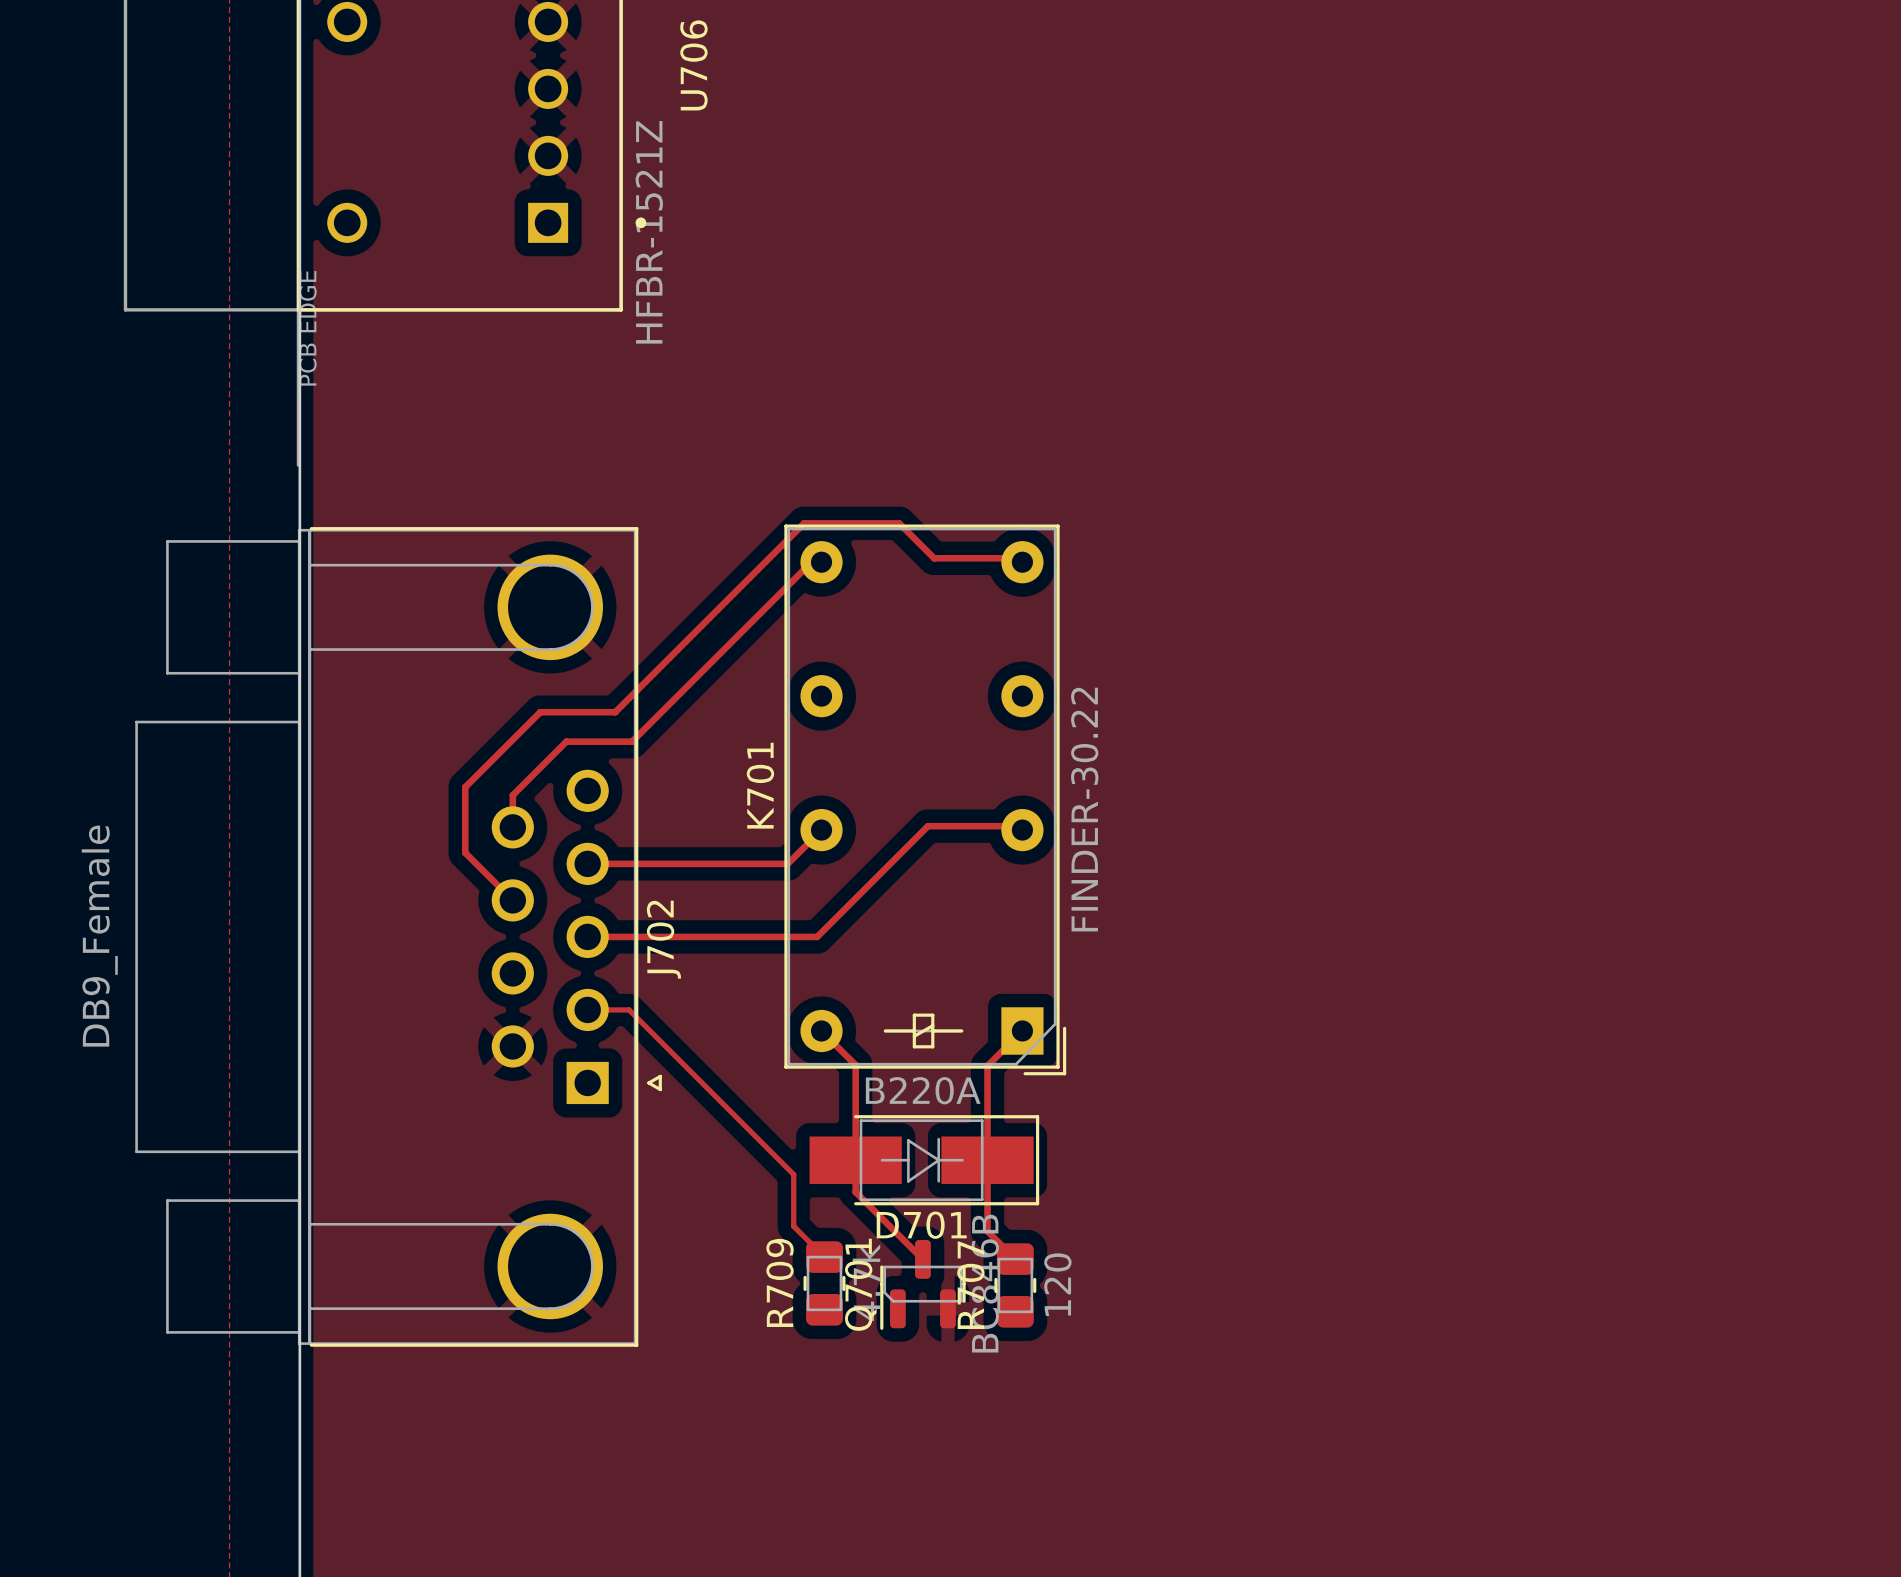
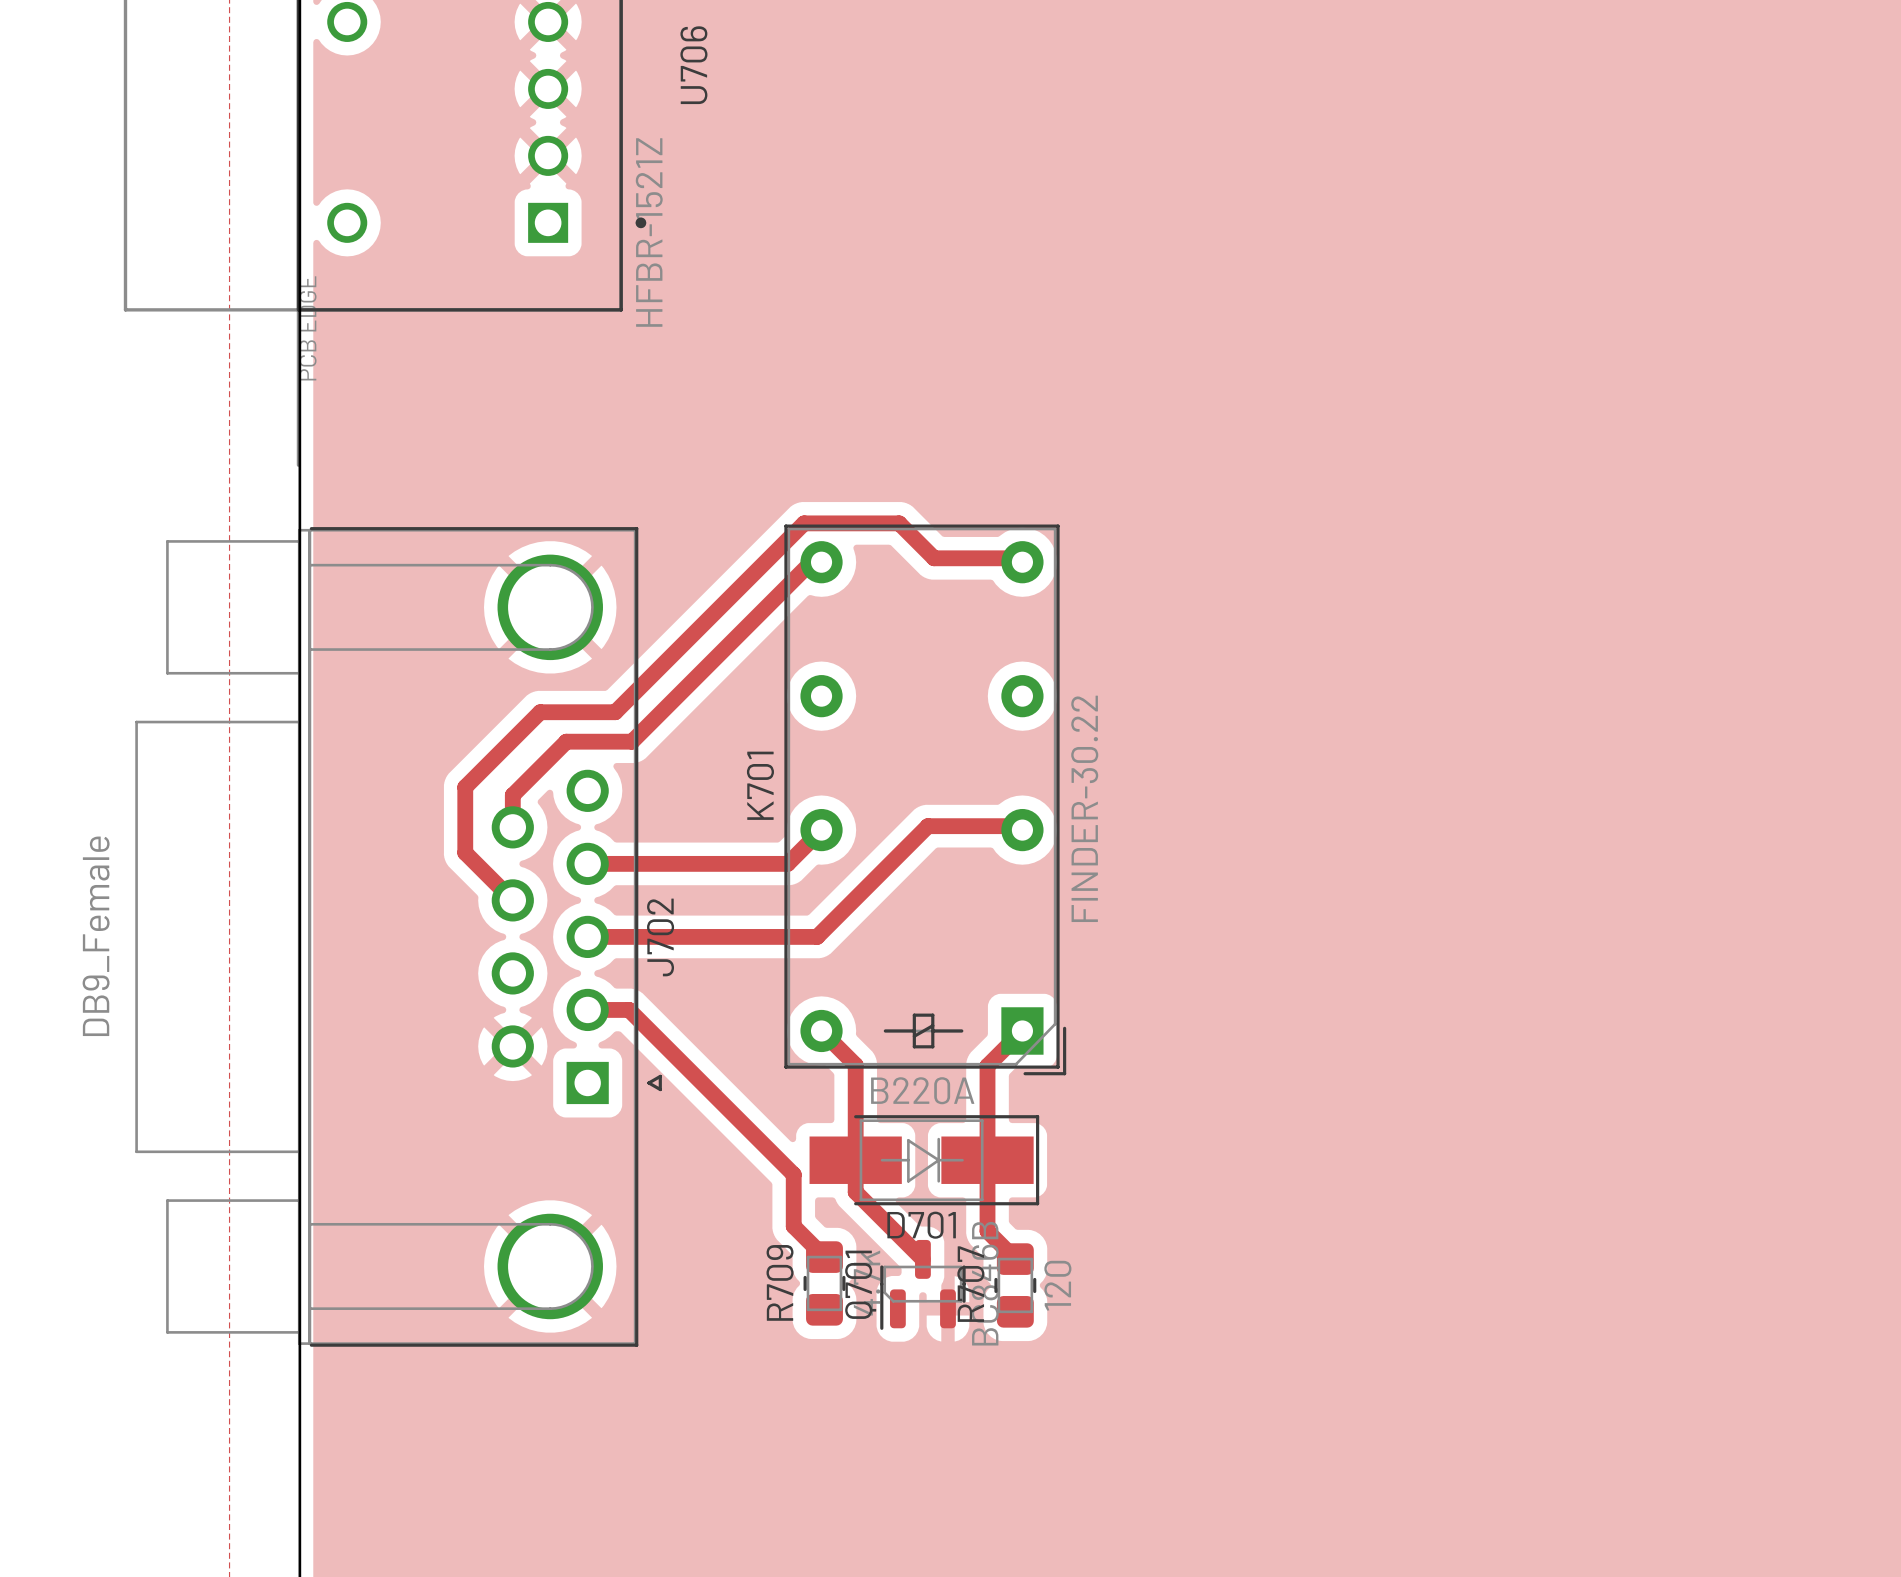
track width: thin (821, 562) (811, 562) (632, 741) (566, 741) (512, 795) (512, 827) -> thick (821, 562) (811, 562) (632, 741) (566, 741) (512, 795) (512, 827)
track width: thin (1022, 562) (1018, 558) (934, 558) (899, 523) (804, 523) (615, 712) (540, 712) (465, 787) (465, 852) (512, 900) -> thick (1022, 562) (1018, 558) (934, 558) (899, 523) (804, 523) (615, 712) (540, 712) (465, 787) (465, 852) (512, 900)
track width: thin (821, 830) (787, 863) (587, 863) -> thick (821, 830) (787, 863) (587, 863)
track width: thin (1022, 830) (1018, 826) (927, 826) (817, 936) (587, 936) -> thick (1022, 830) (1018, 826) (927, 826) (817, 936) (587, 936)
track width: thin (587, 1009) (629, 1009) (793, 1174) (793, 1226) (824, 1257) -> thick (587, 1009) (629, 1009) (793, 1174) (793, 1226) (824, 1257)
track width: thin (821, 1030) (855, 1065) (855, 1192) (922, 1259) -> thick (821, 1030) (855, 1065) (855, 1192) (922, 1259)
track width: thin (1022, 1030) (987, 1065) (987, 1231) (1015, 1259) -> thick (1022, 1030) (987, 1065) (987, 1231) (1015, 1259)

